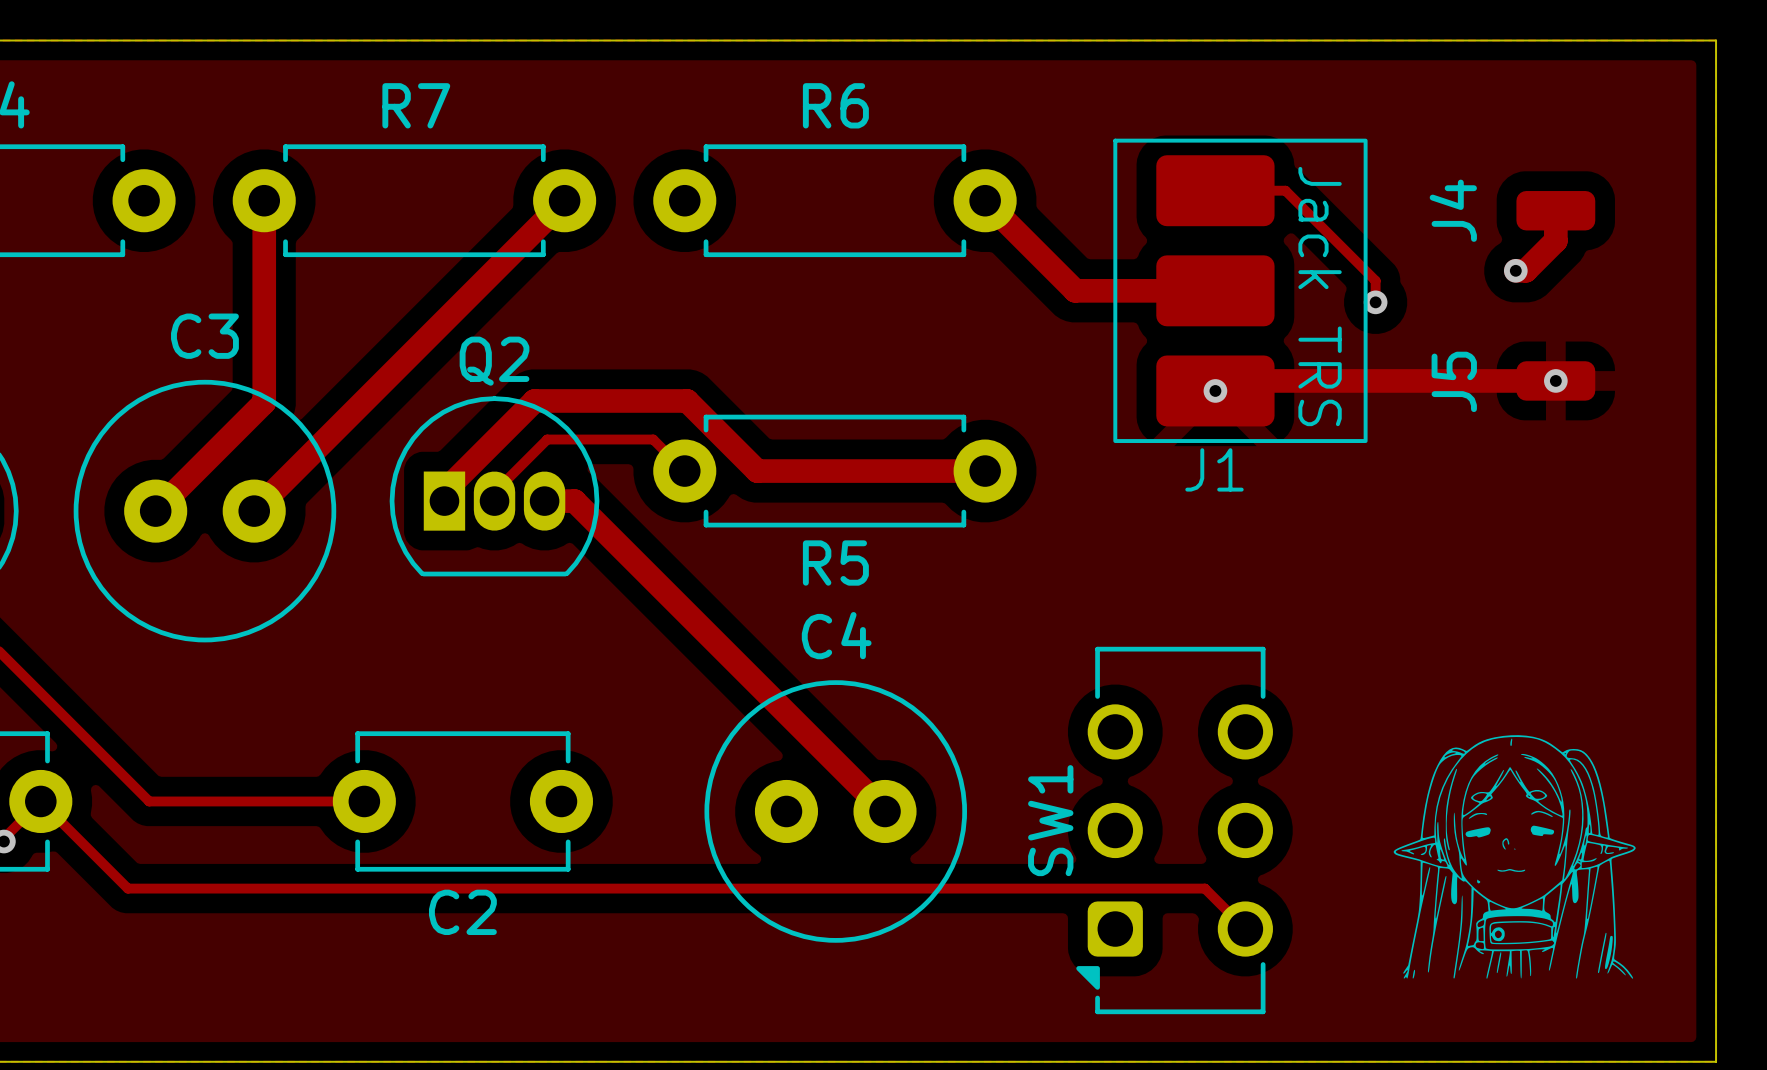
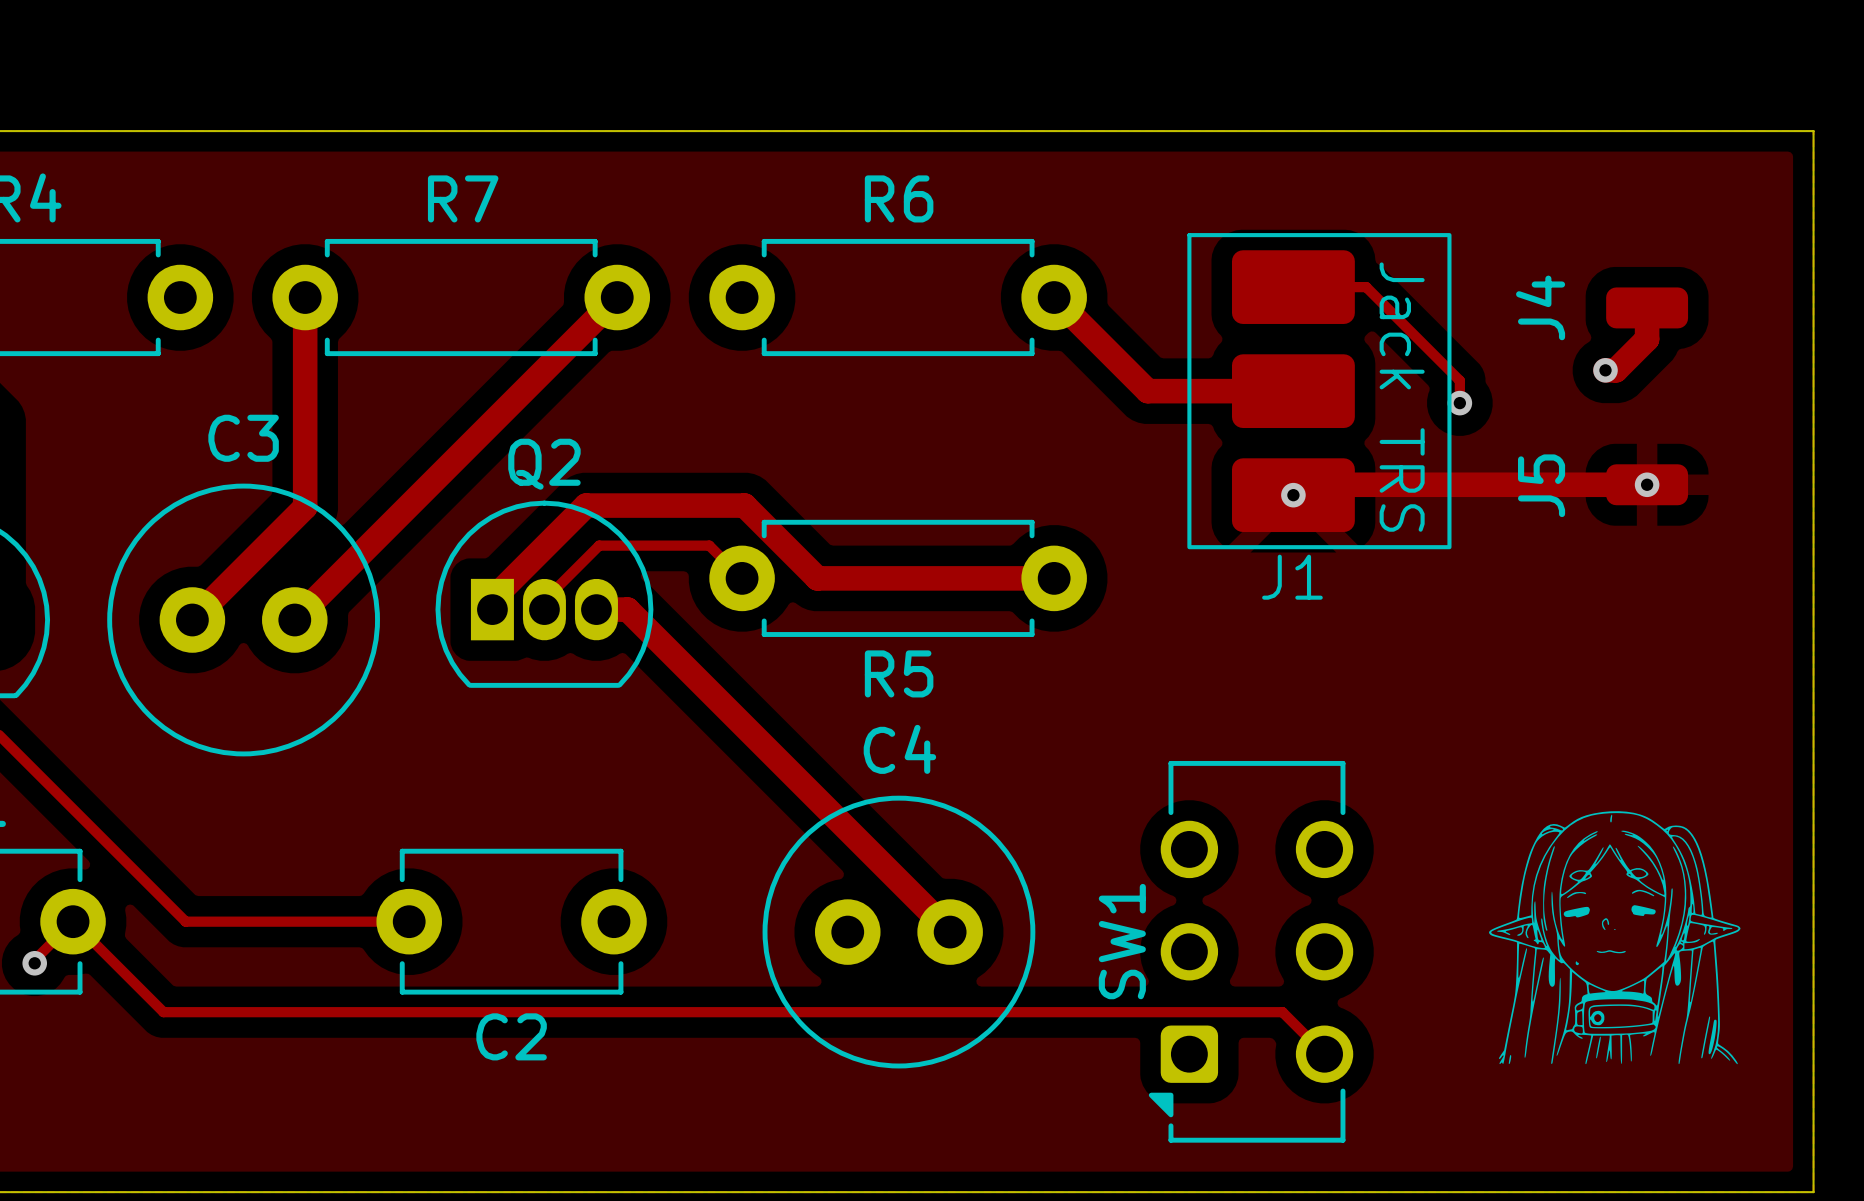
drawing position: (1514, 856) -> (1614, 937)

